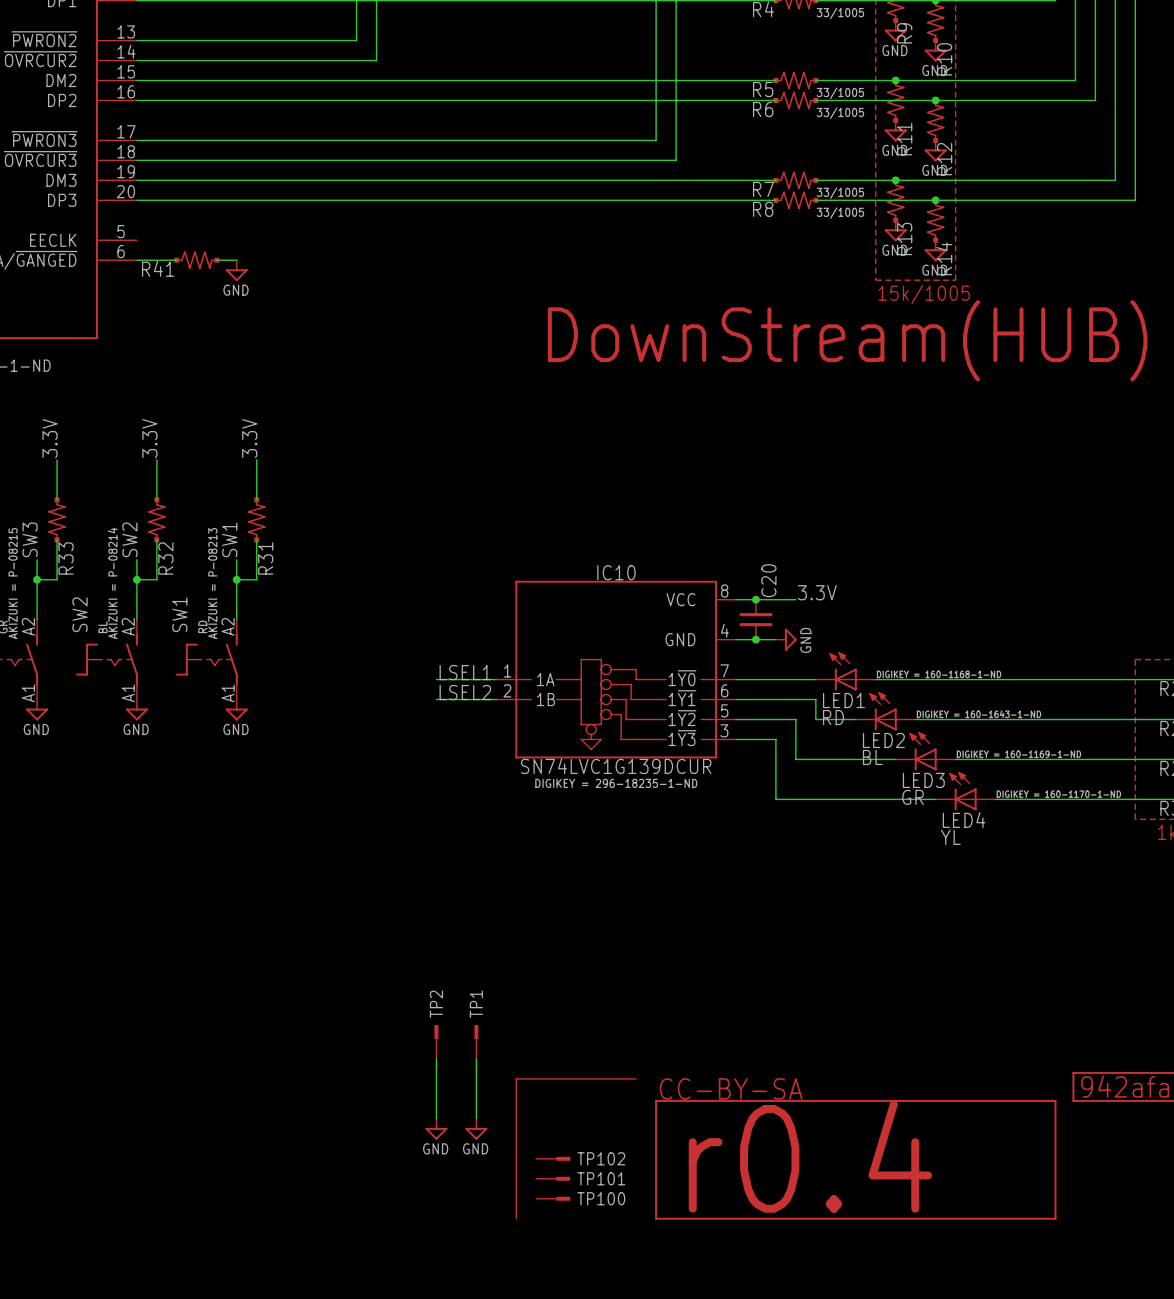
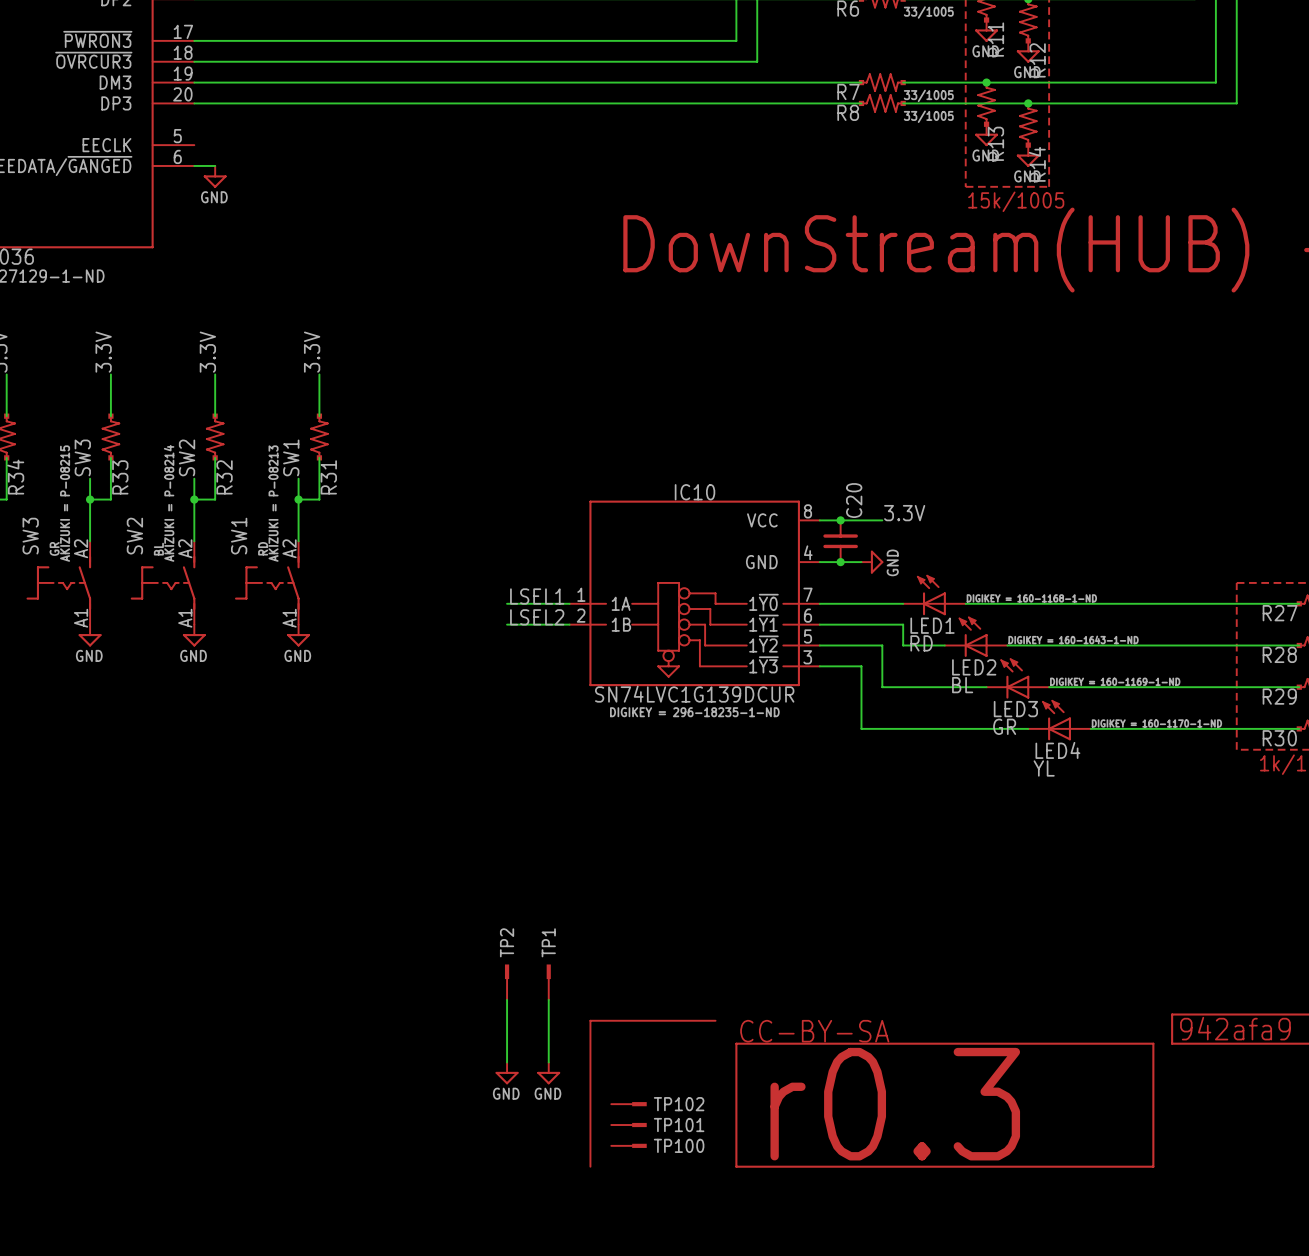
wire: (156, 260) (176, 260) -> none
R41: (196, 260) -> none
wire: (216, 260) (236, 260) -> none
power symbol position: GND (236, 270) -> GND (215, 176)
part value: r0.4 (810, 1156) -> r0.3 (895, 1104)

